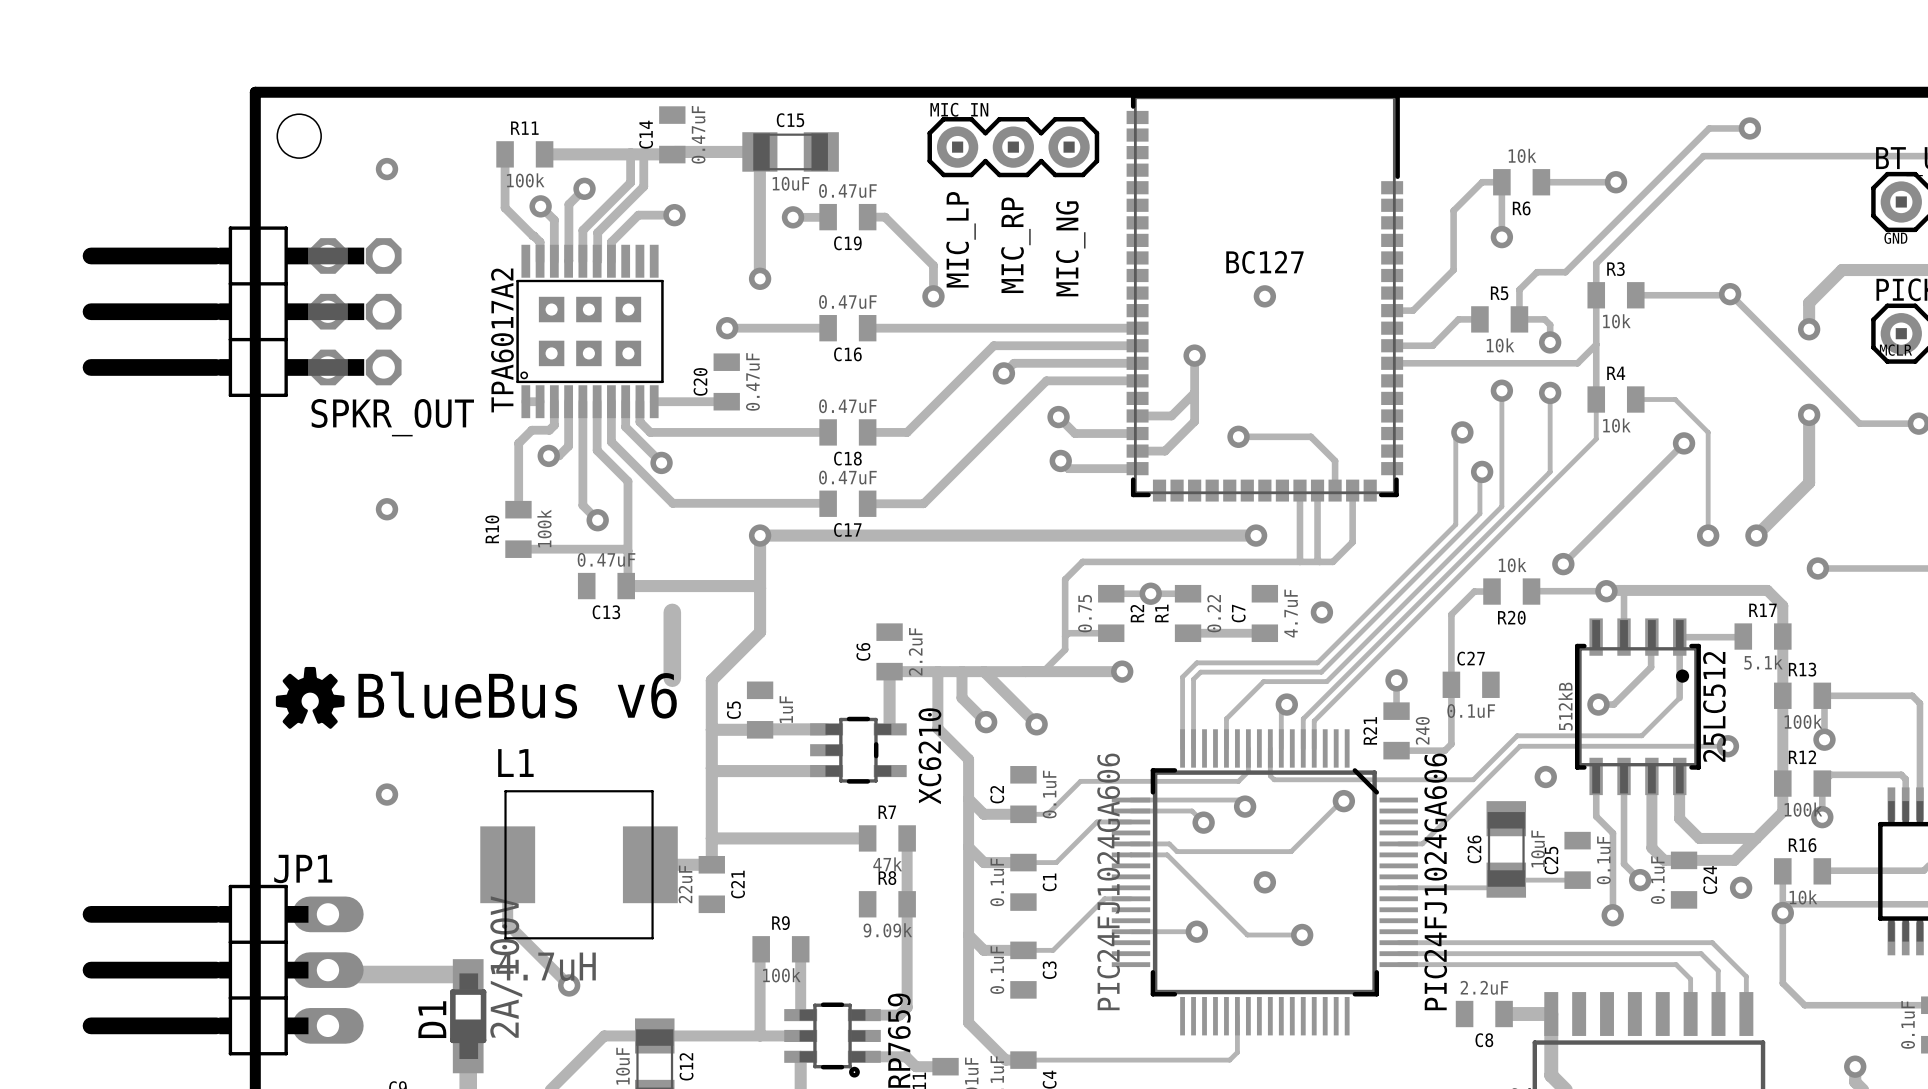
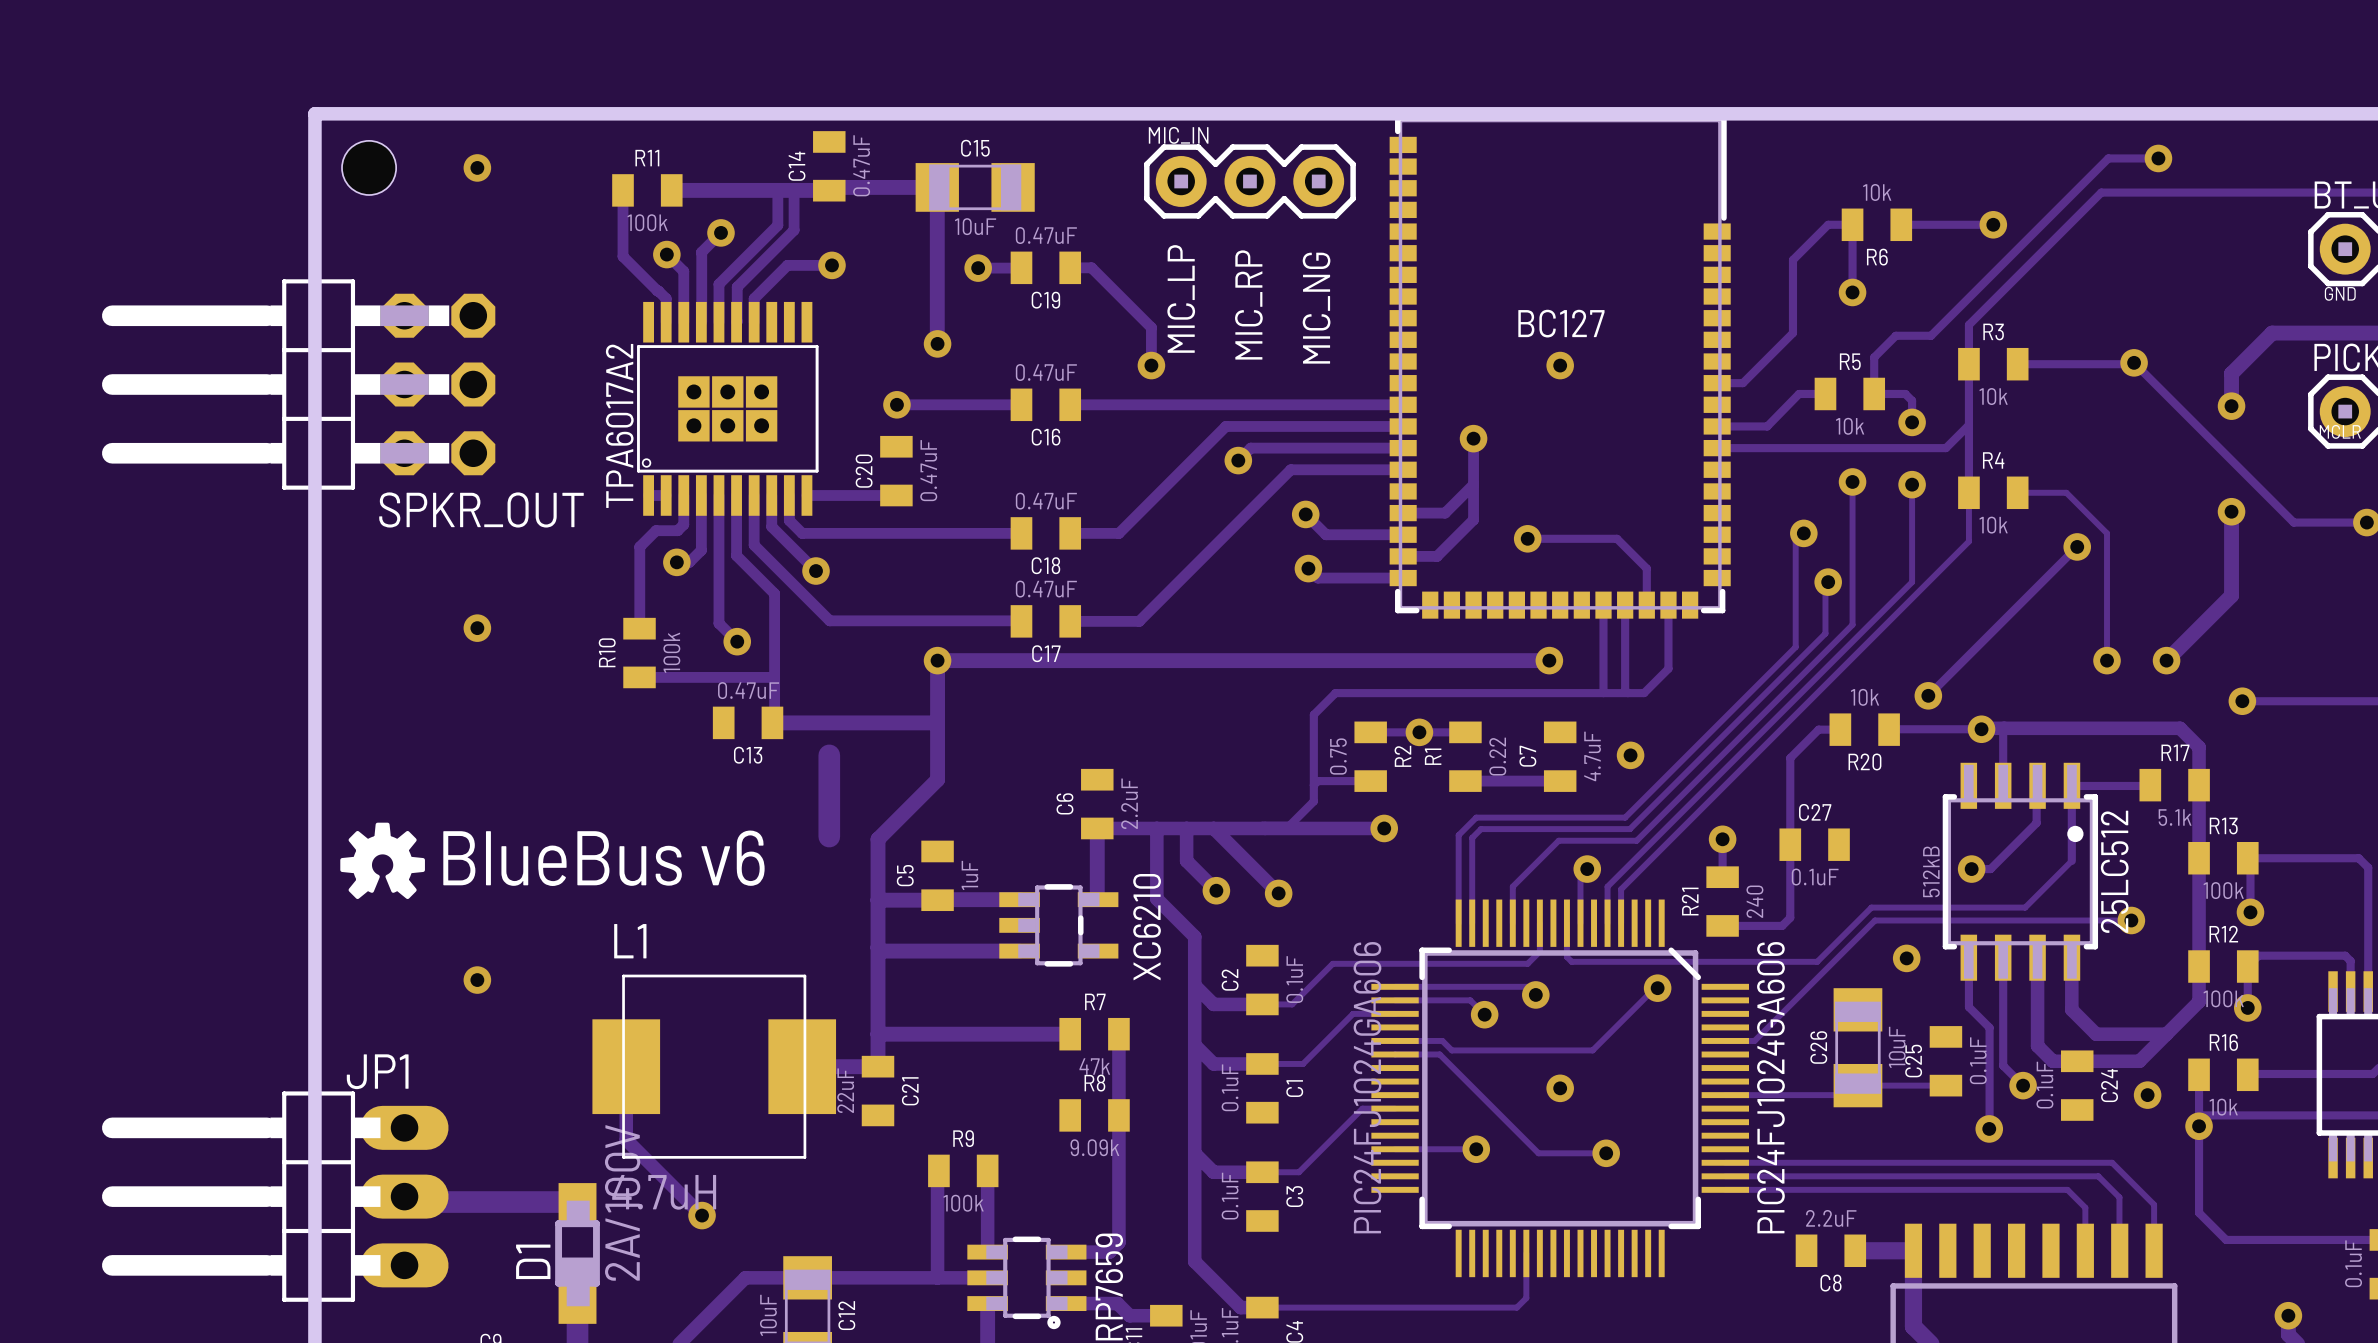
via position: (387, 169) -> (477, 167)
TPA6017A2 footprint: [516, 244, 664, 419] -> [637, 301, 819, 516]

